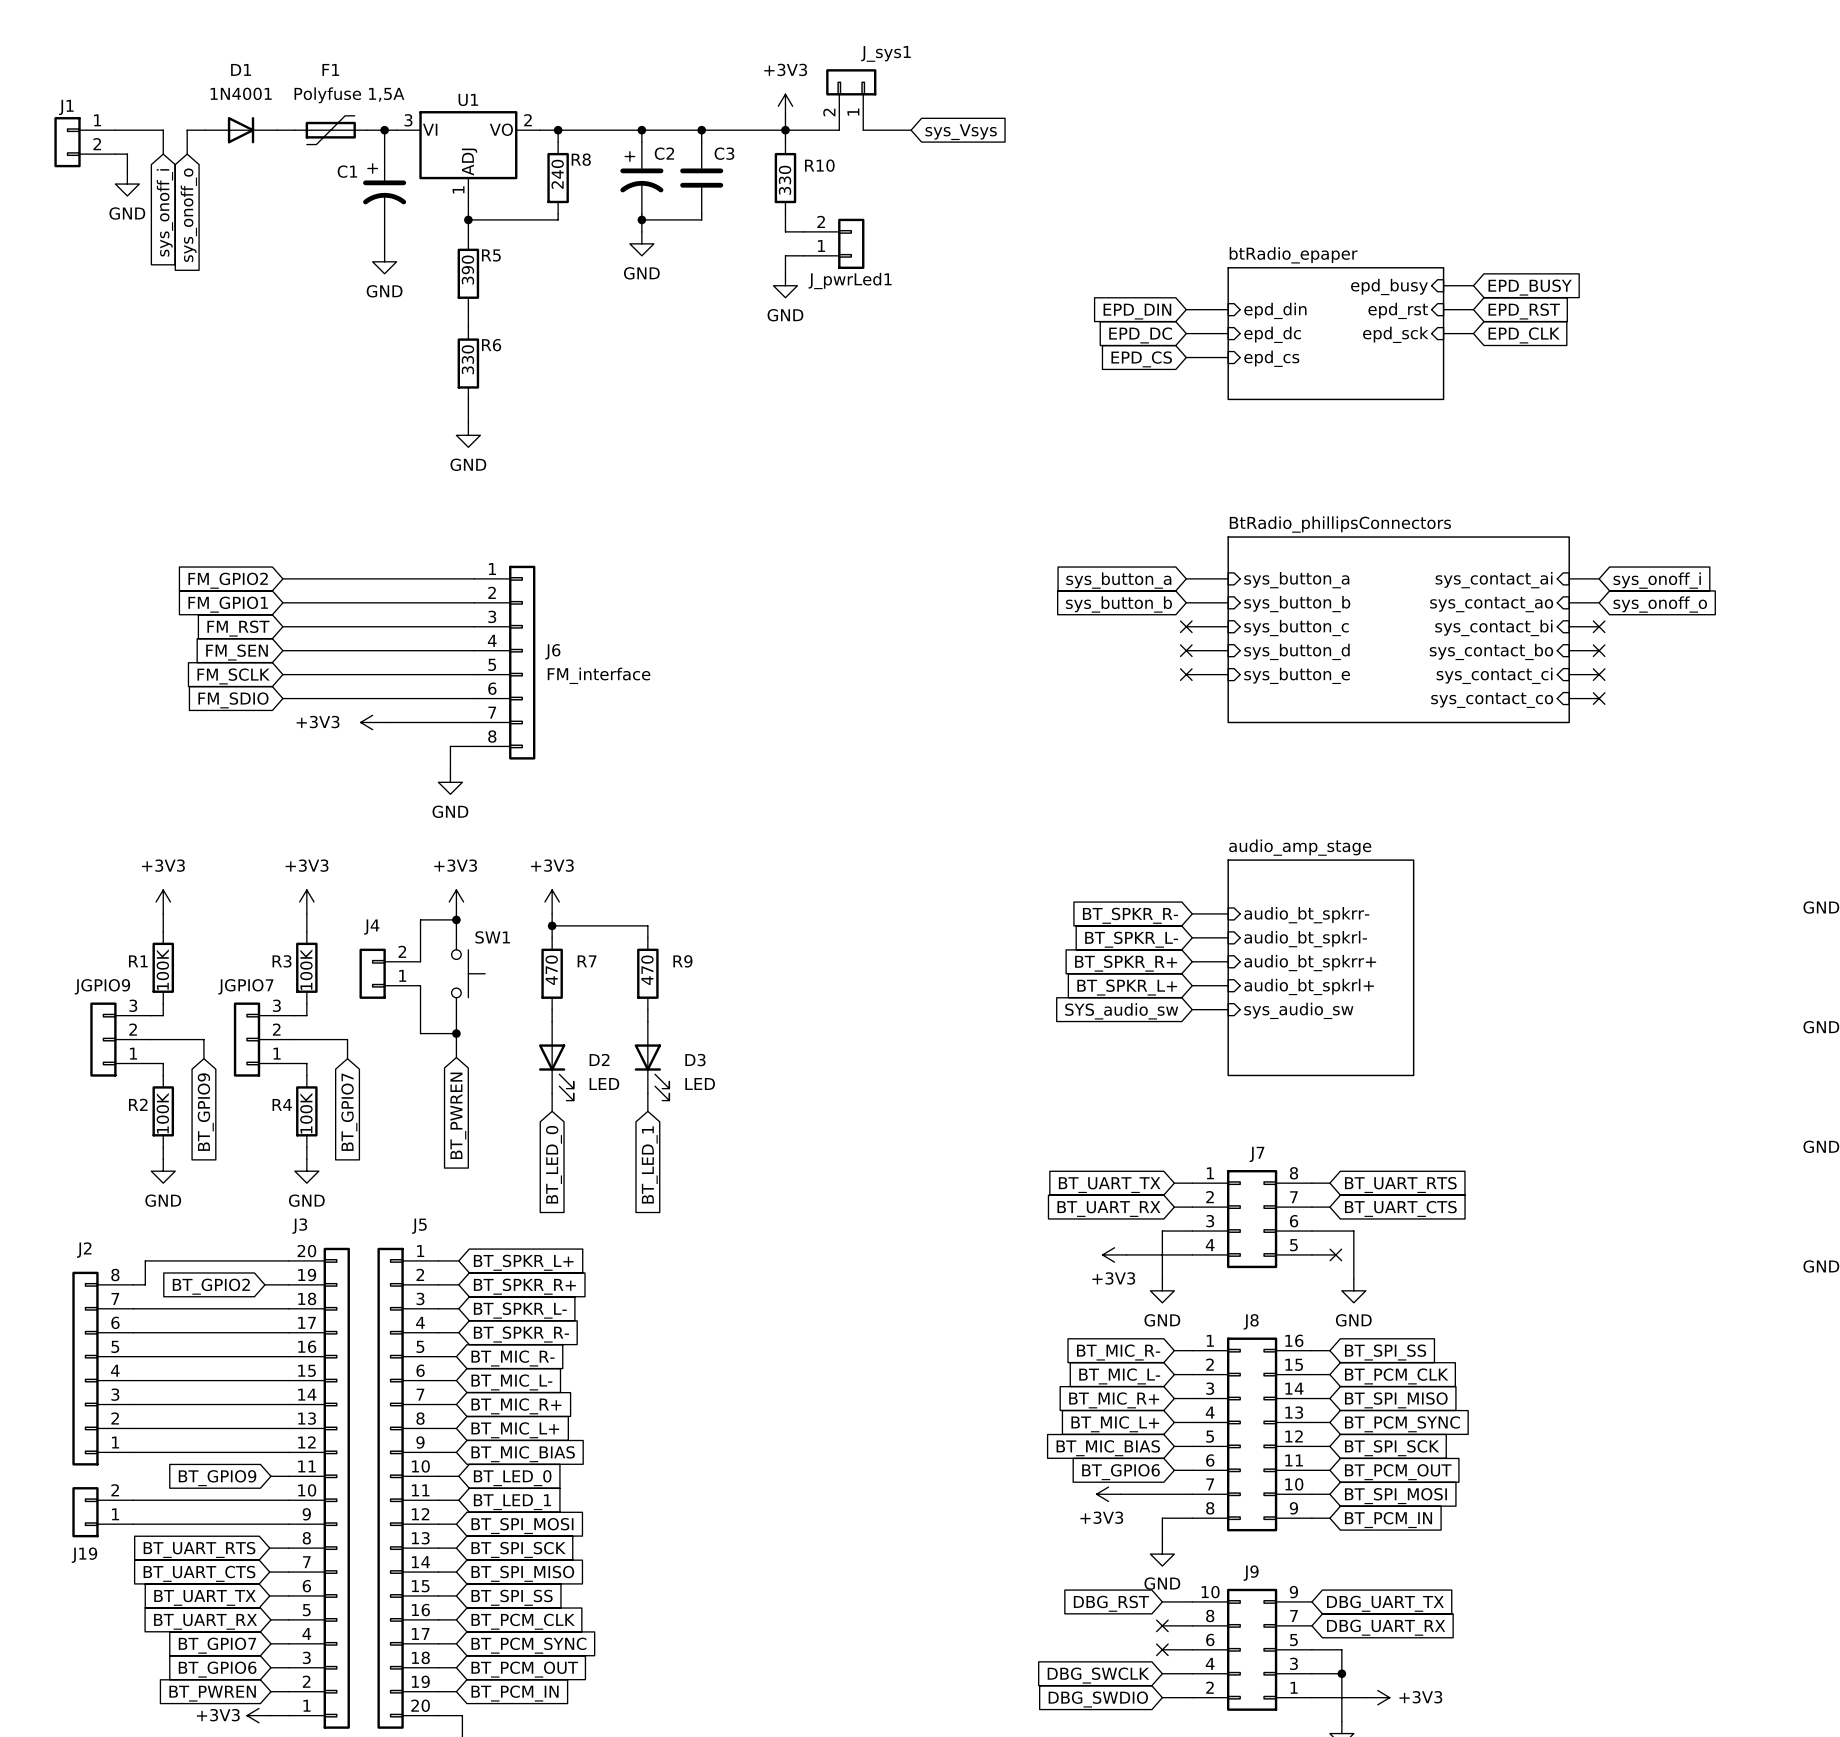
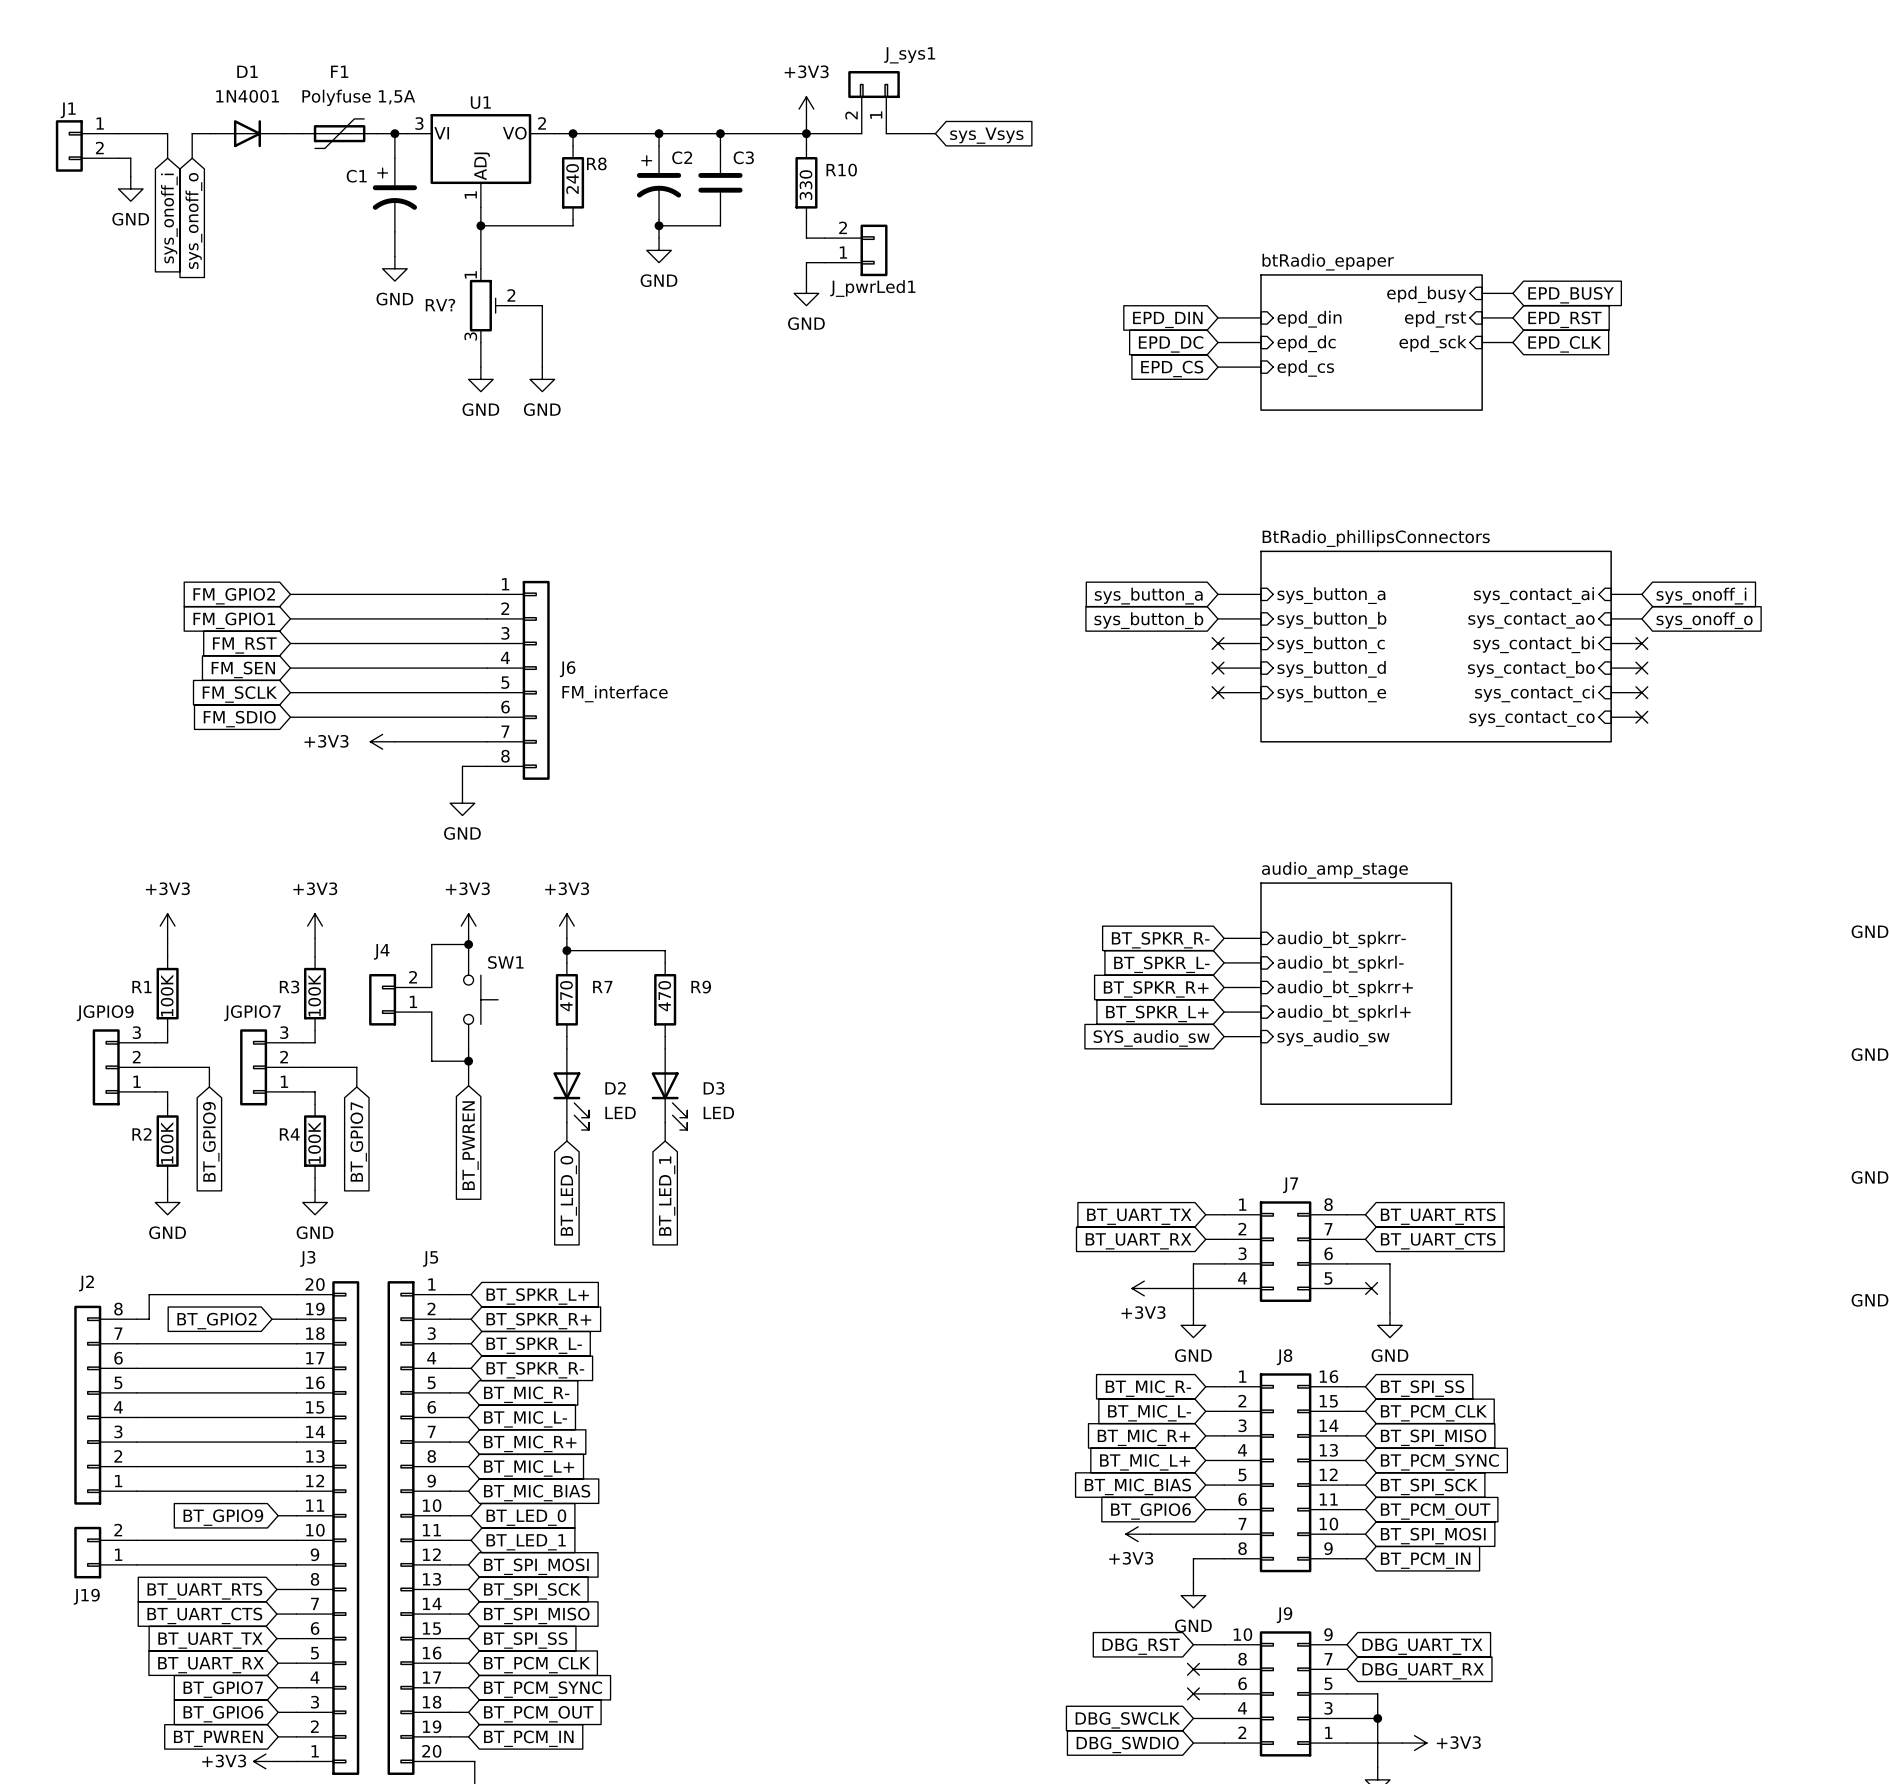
R5: 390 (468, 273) -> none
RV?: none -> (493, 305)
wire: none -> (517, 305) (542, 305) (542, 367)
wire: (468, 309) (468, 327) -> none
R6: 330 (468, 363) -> none
power symbol: none -> GND (480, 379)
power symbol: none -> GND (542, 379)
wire: (468, 399) (468, 423) -> (480, 342) (480, 367)
power symbol: GND (468, 435) -> none

